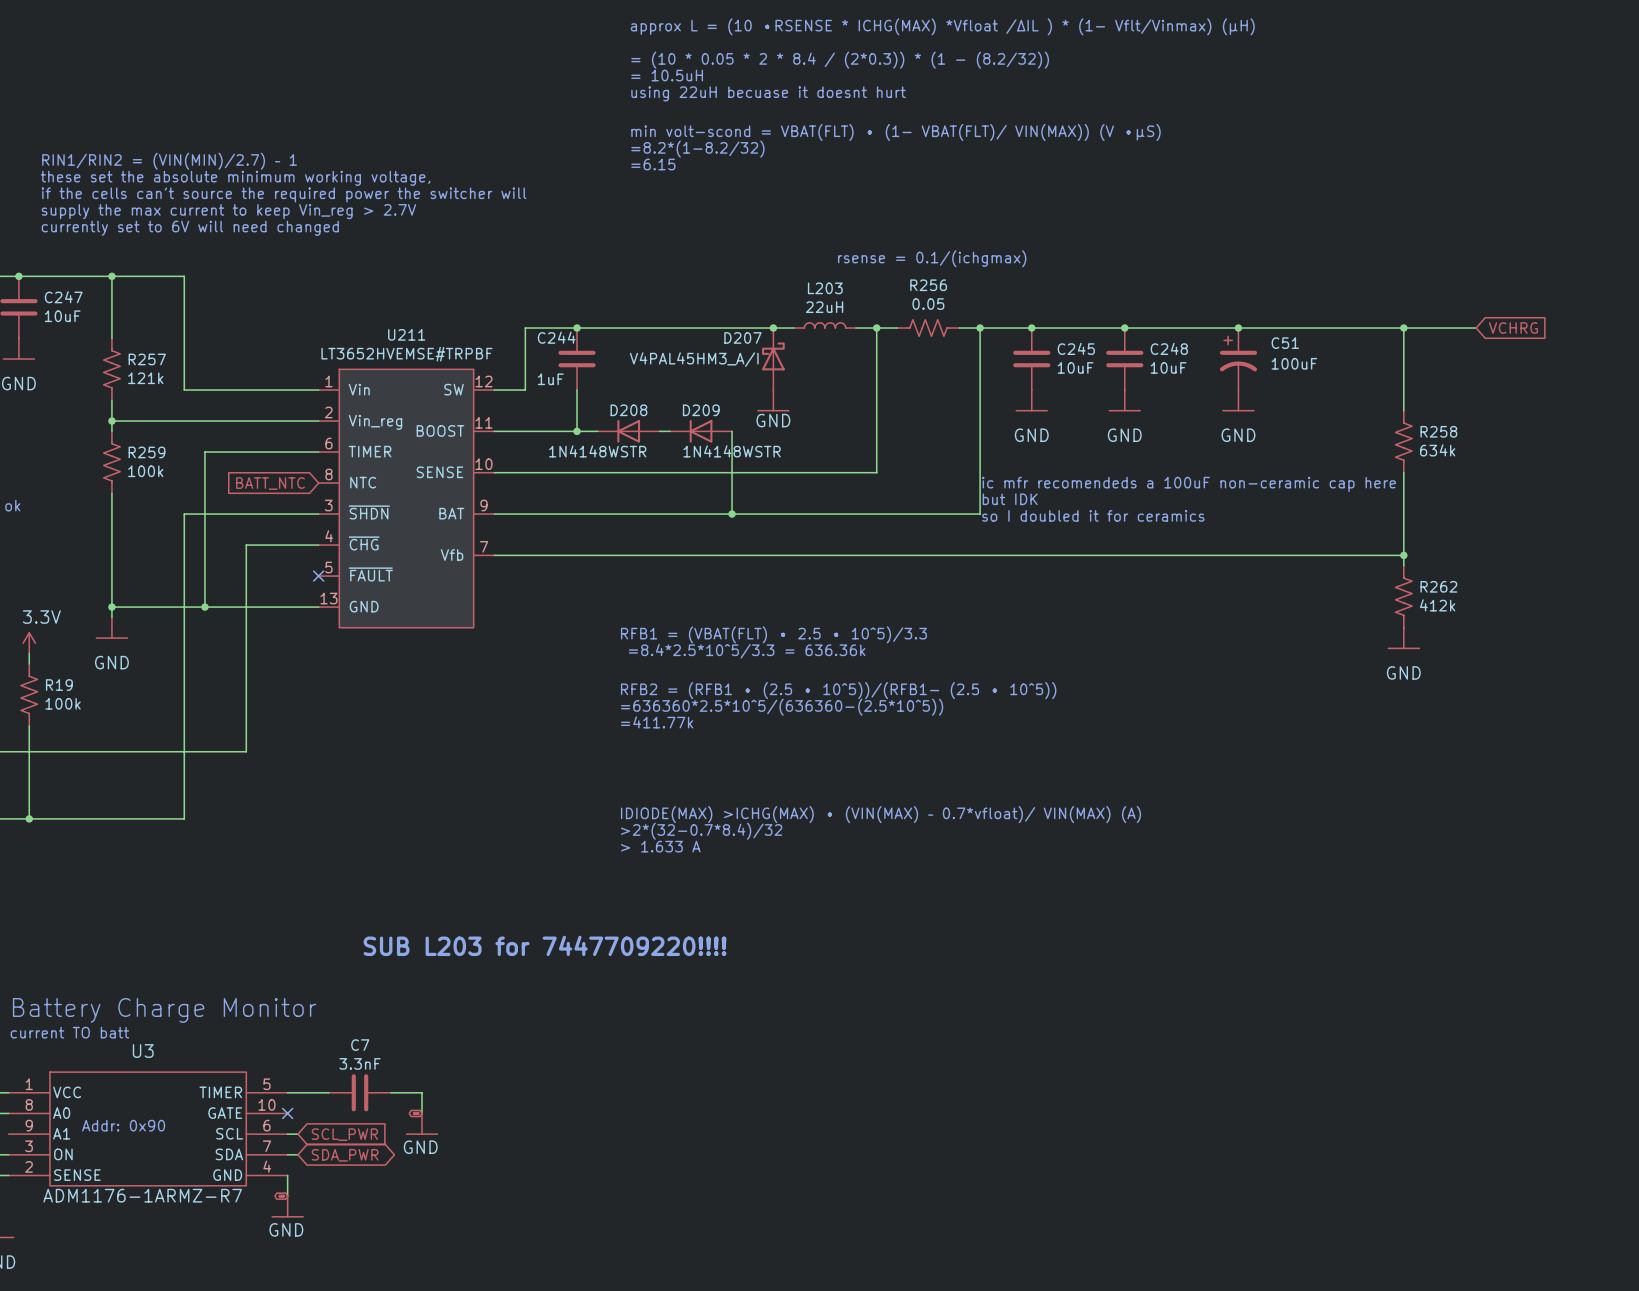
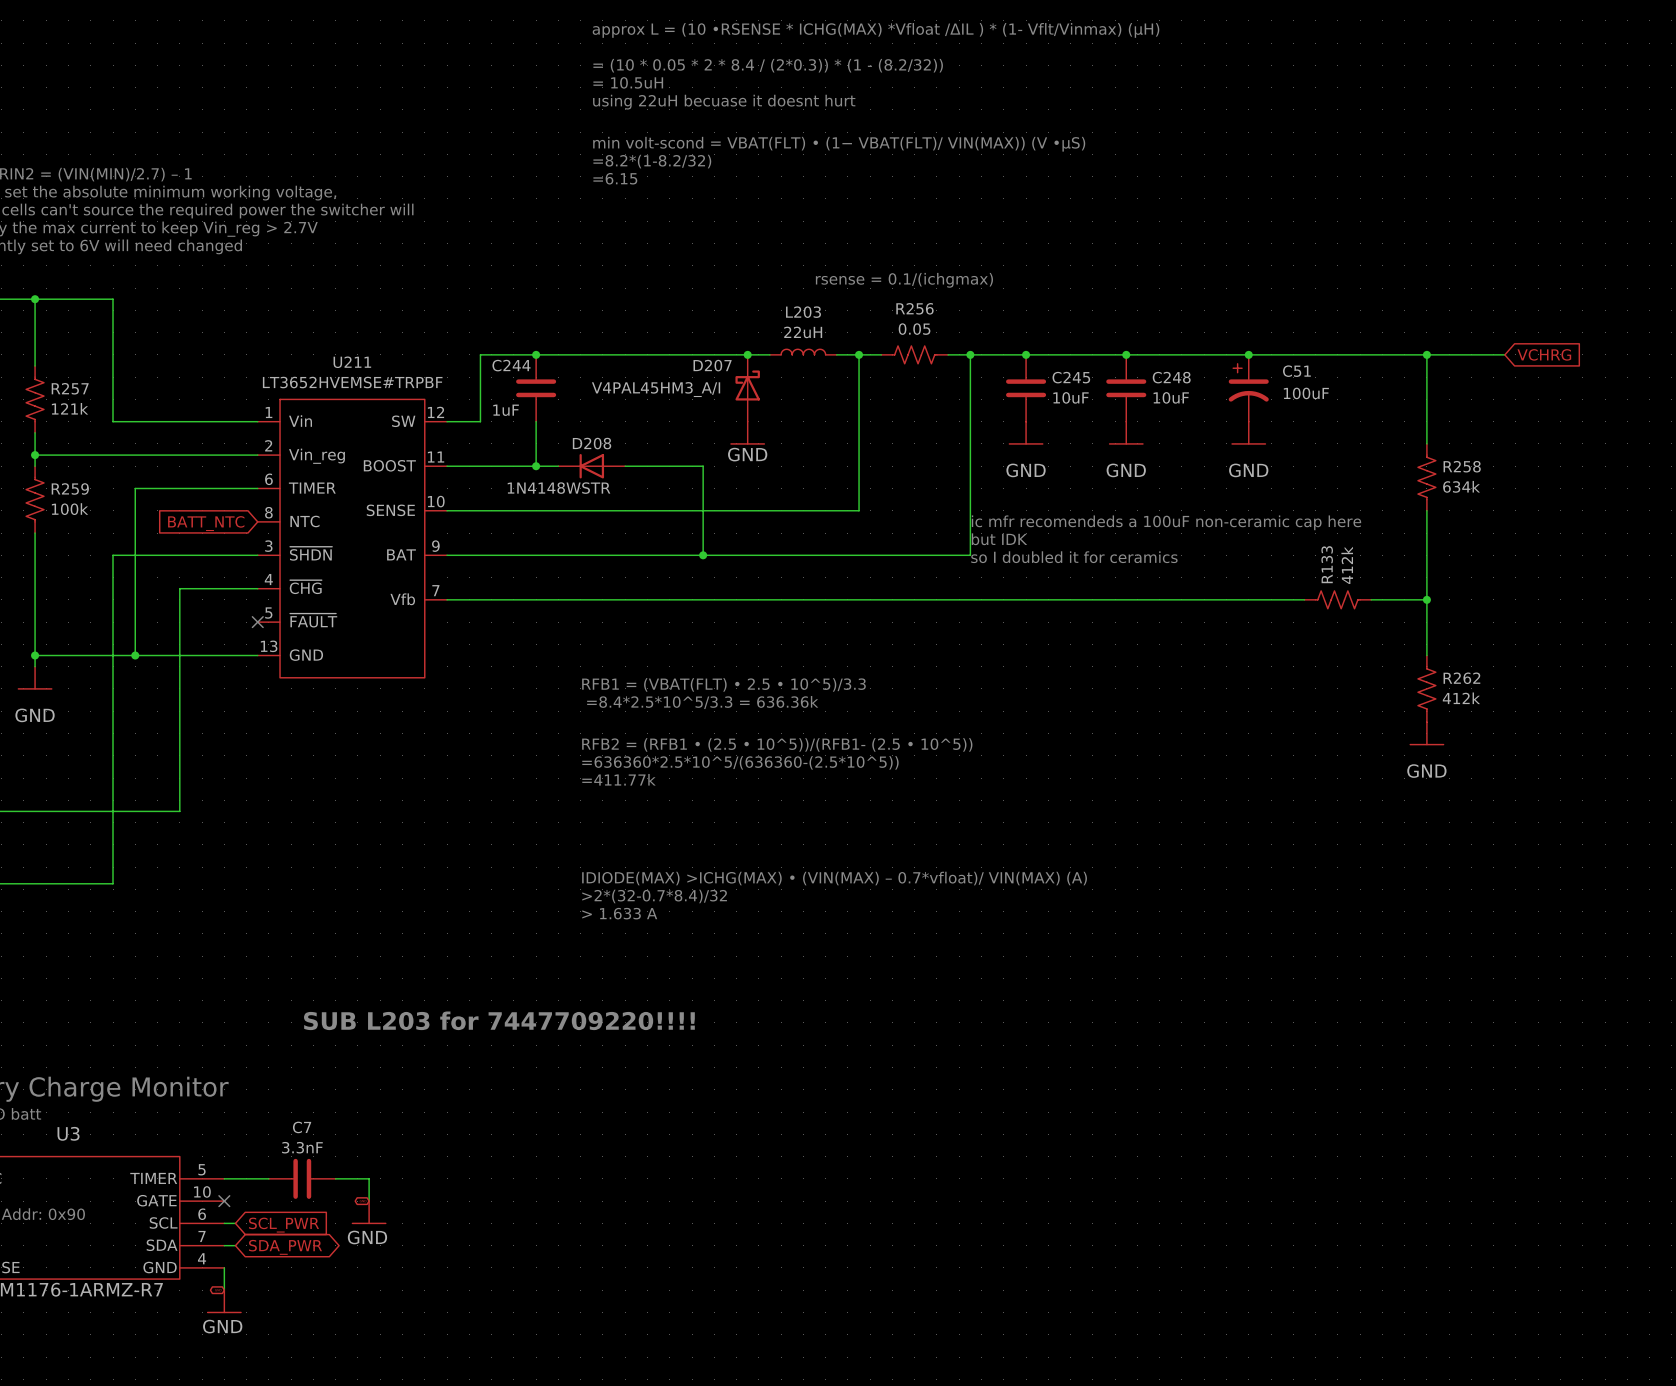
D209: 1N4148WSTR (701, 431) -> none
R133: none -> 412k (1337, 599)
wire: none -> (1426, 610) (1426, 655)
R262 position: (1403, 596) -> (1426, 688)
power symbol position: GND (1403, 638) -> GND (1426, 733)

